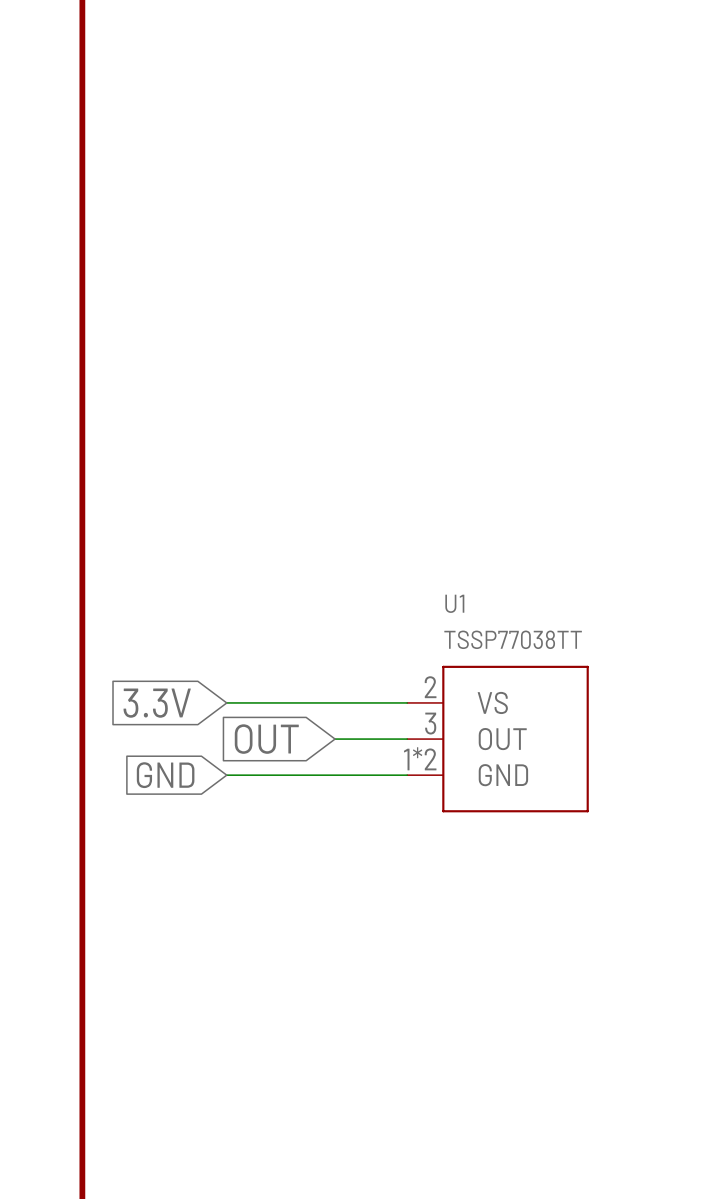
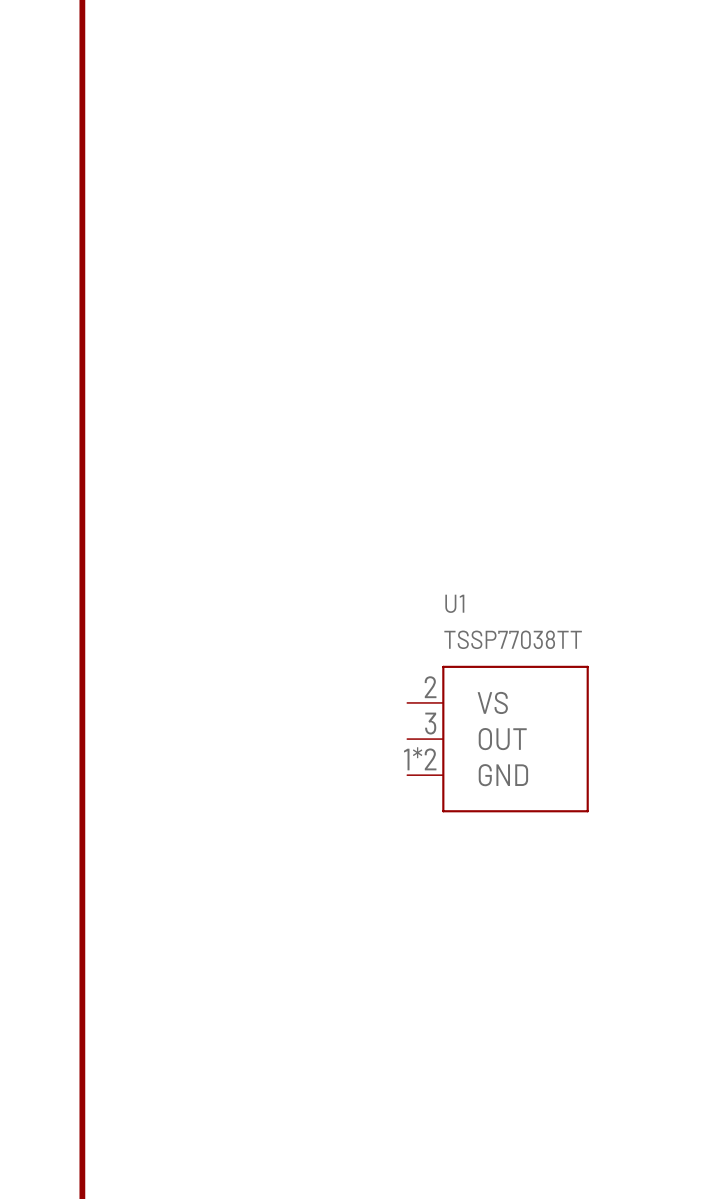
wire: (226, 702) (407, 702) -> none
global label: 3.3V (157, 703) -> none
global label: OUT (266, 739) -> none
wire: (335, 739) (407, 739) -> none
global label: GND (165, 775) -> none
wire: (226, 775) (407, 775) -> none

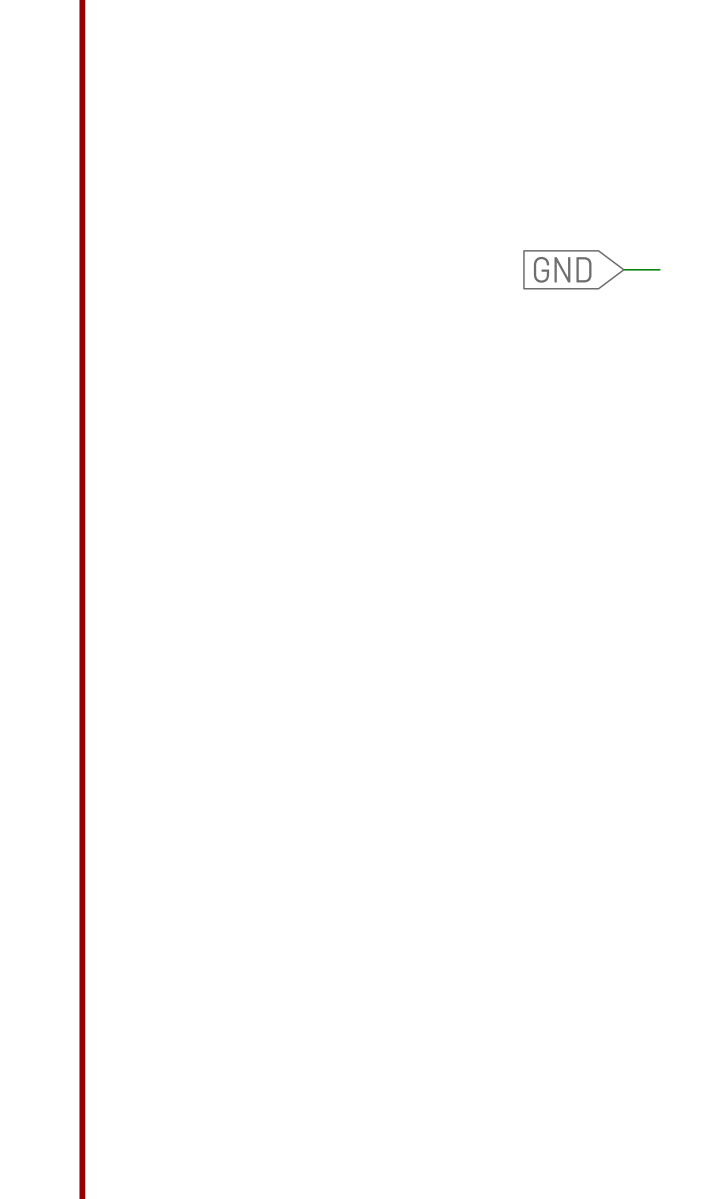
global label: none -> GND (562, 269)
wire: none -> (623, 269) (659, 269)
U1: TSSP77038TT (498, 739) -> none

